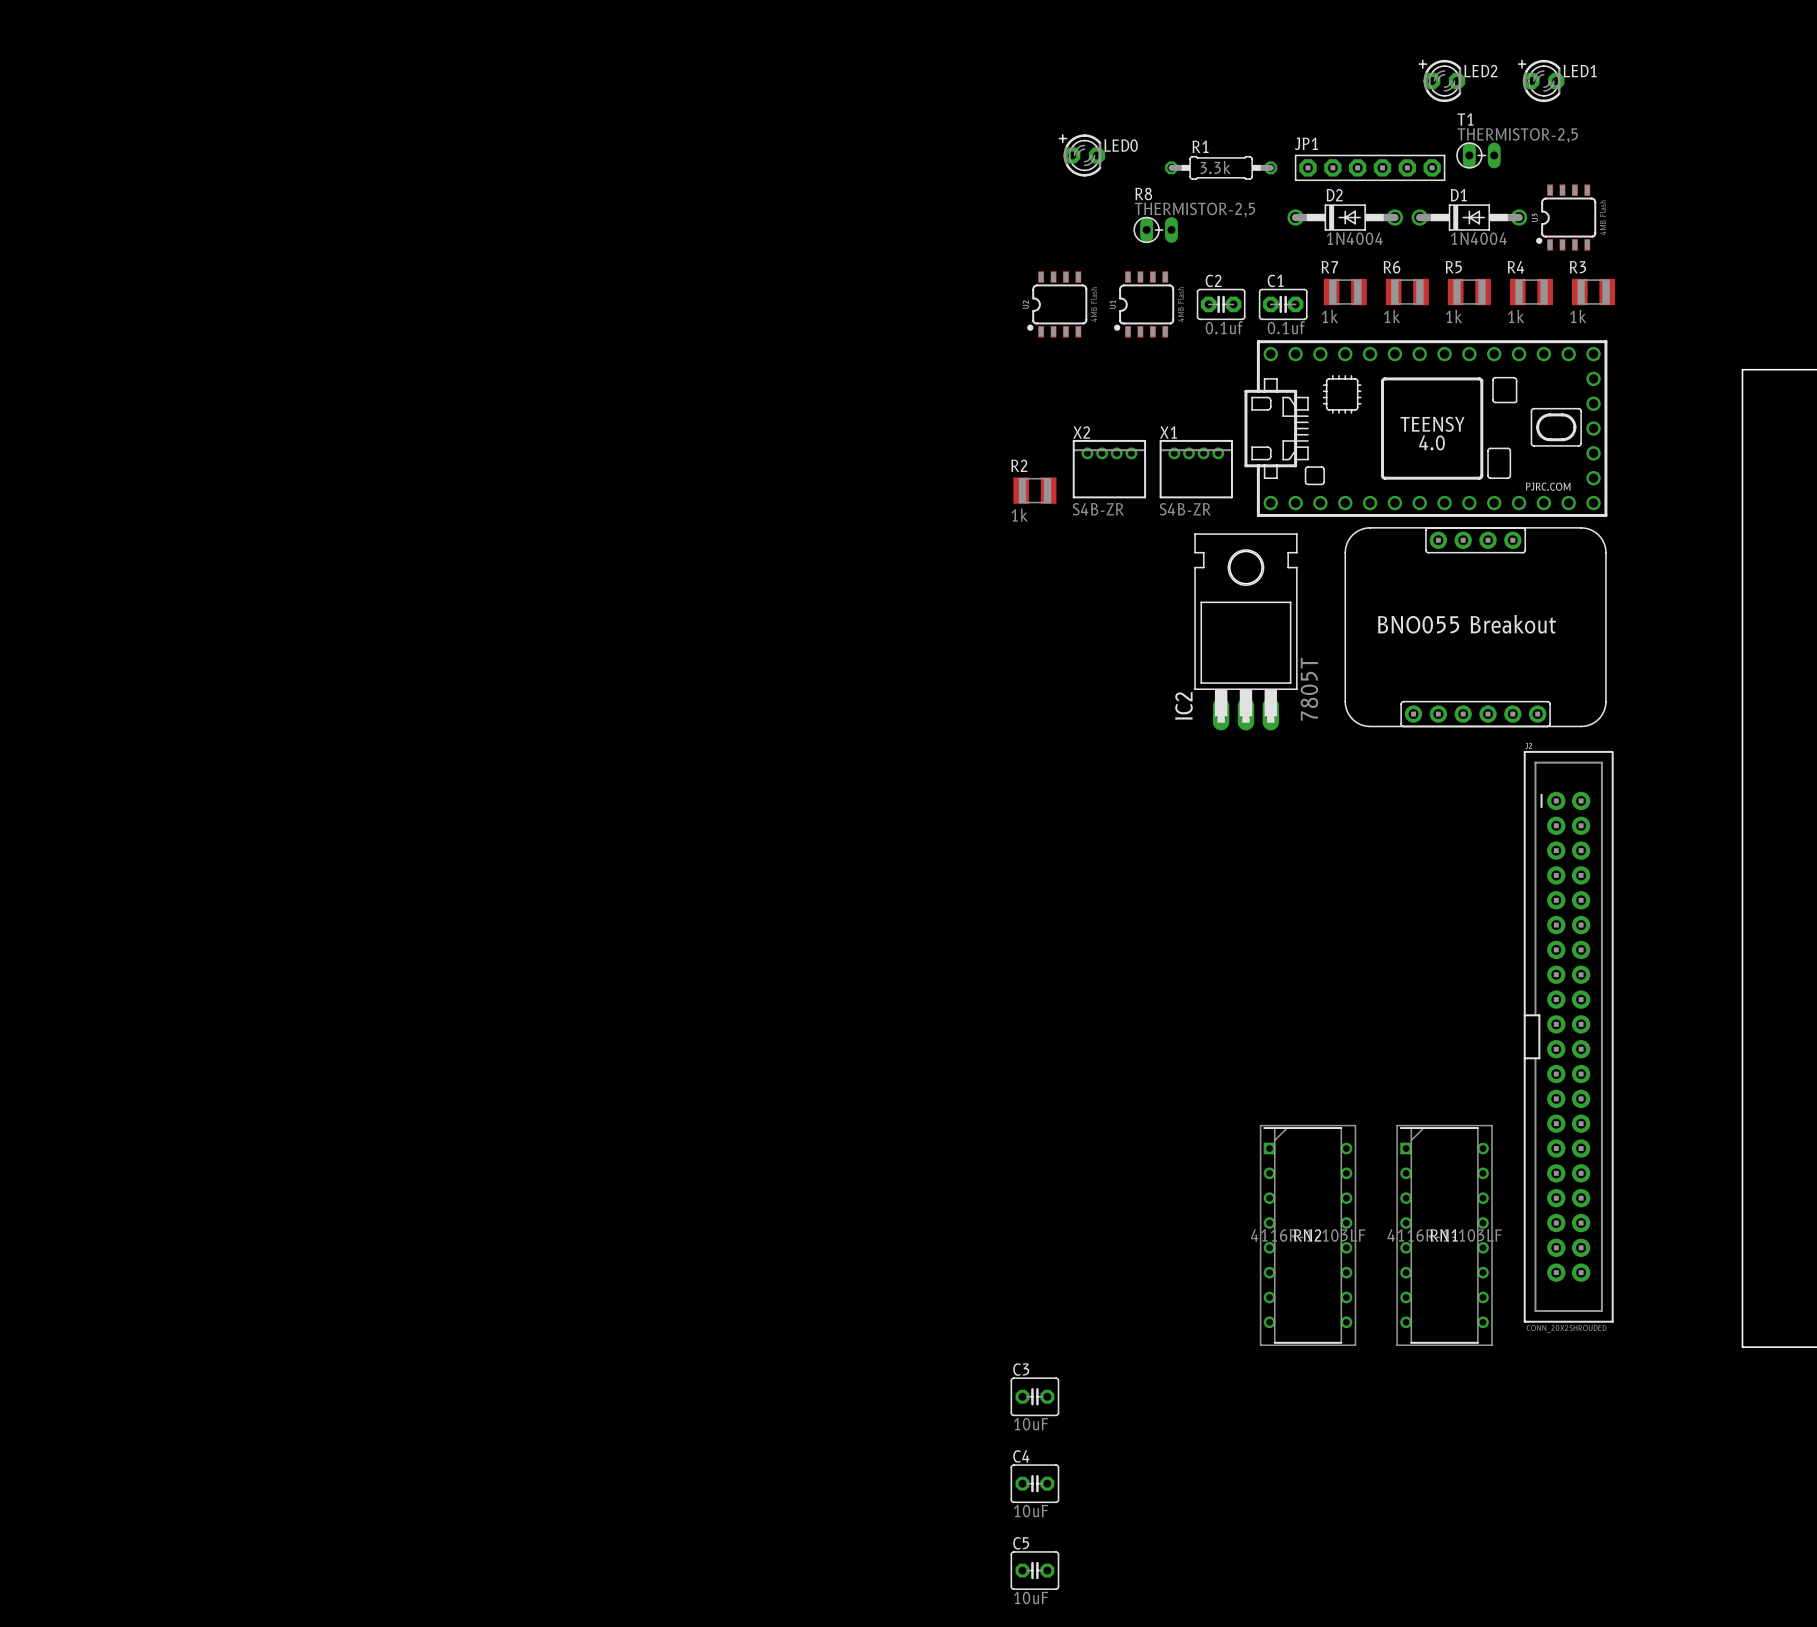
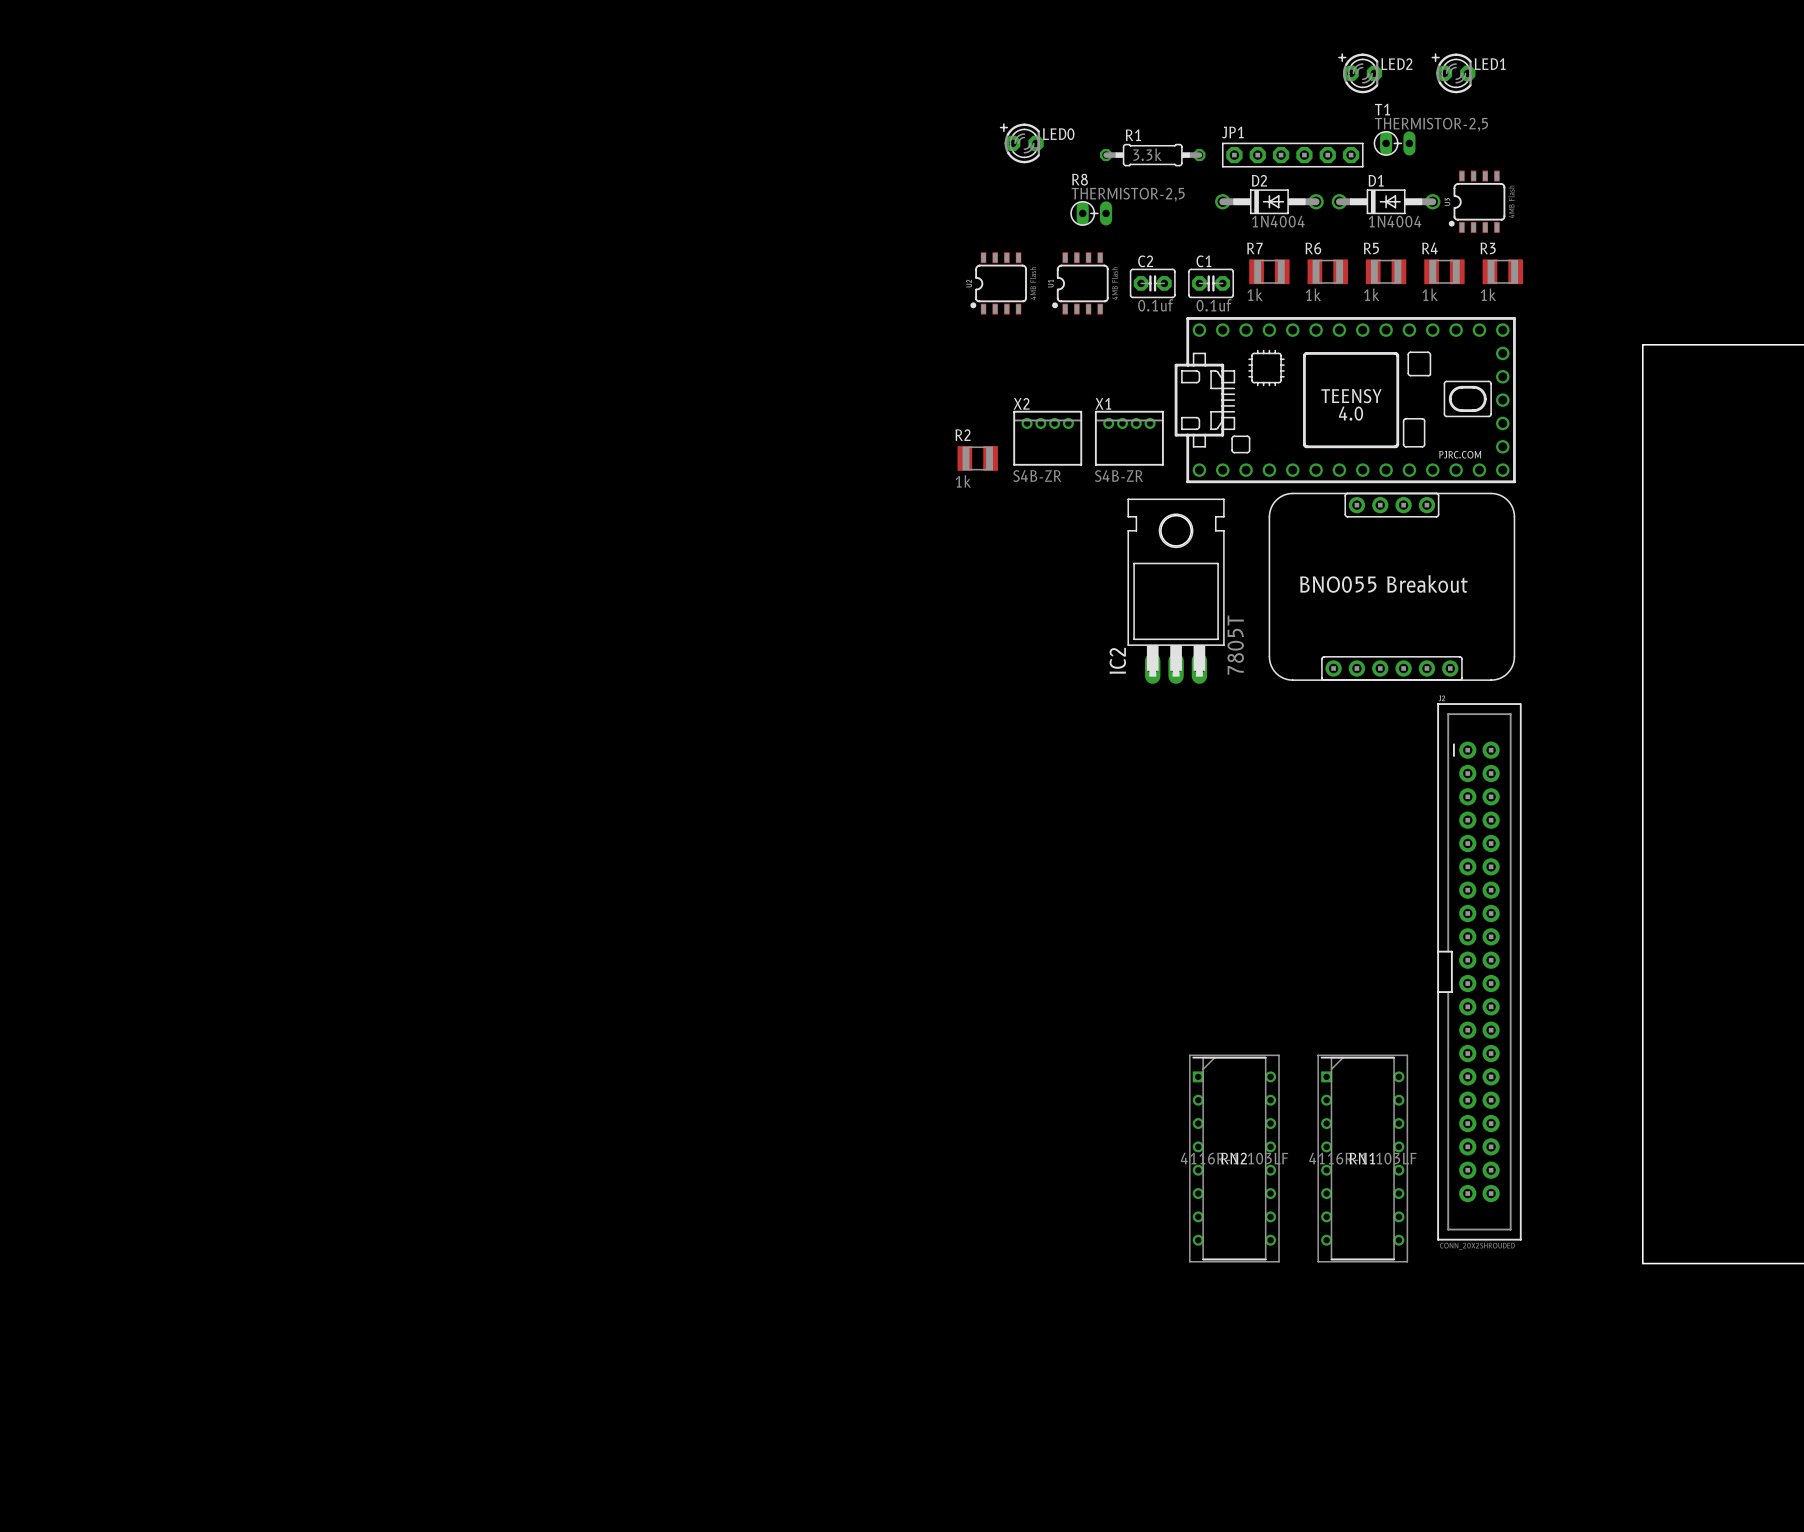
C3: 10uF (1034, 1396) -> none
C4: 10uF (1034, 1483) -> none
C5: 10uF (1034, 1570) -> none

